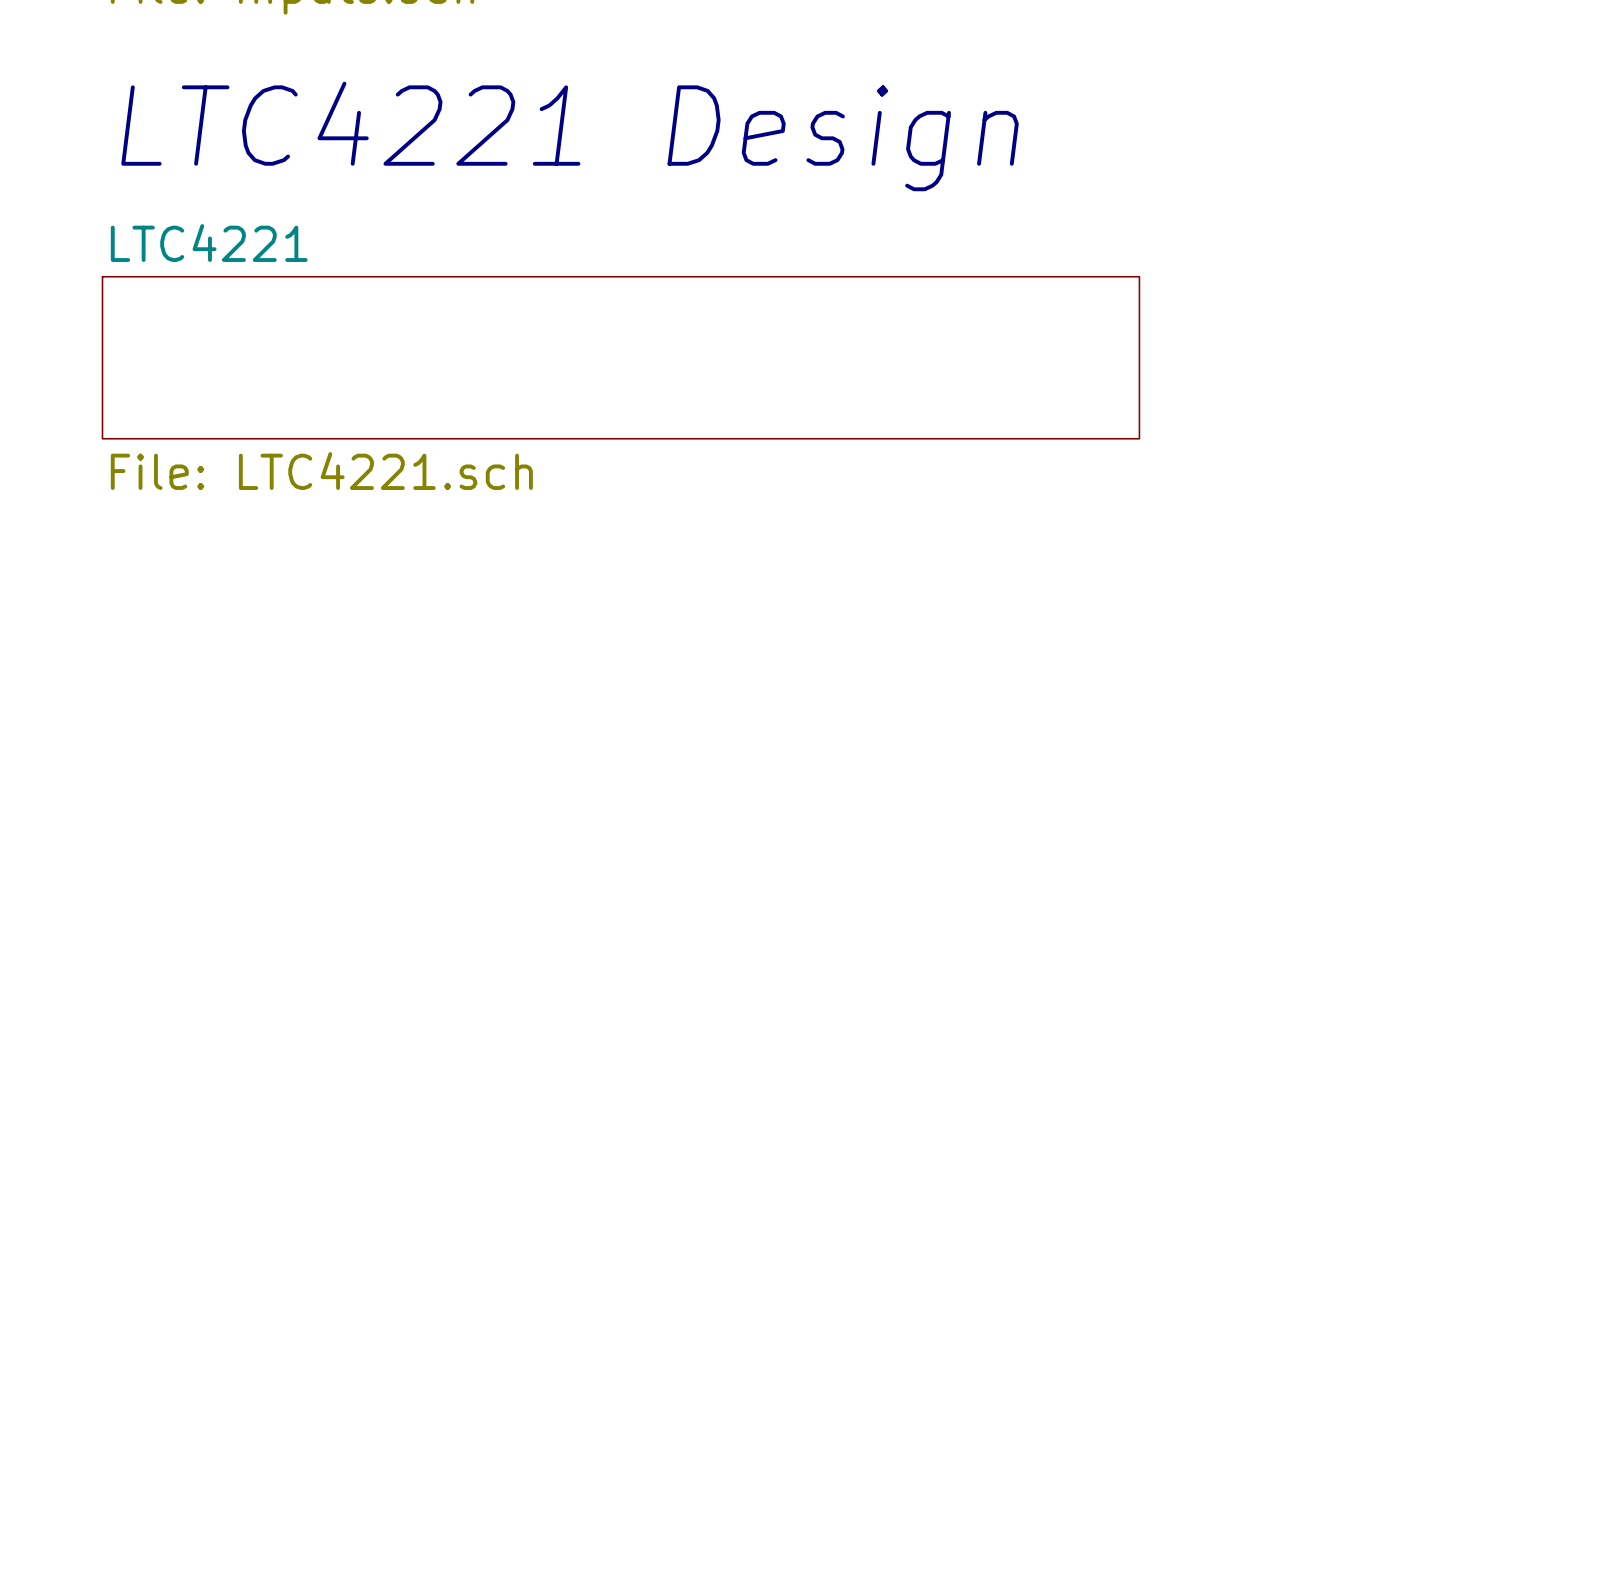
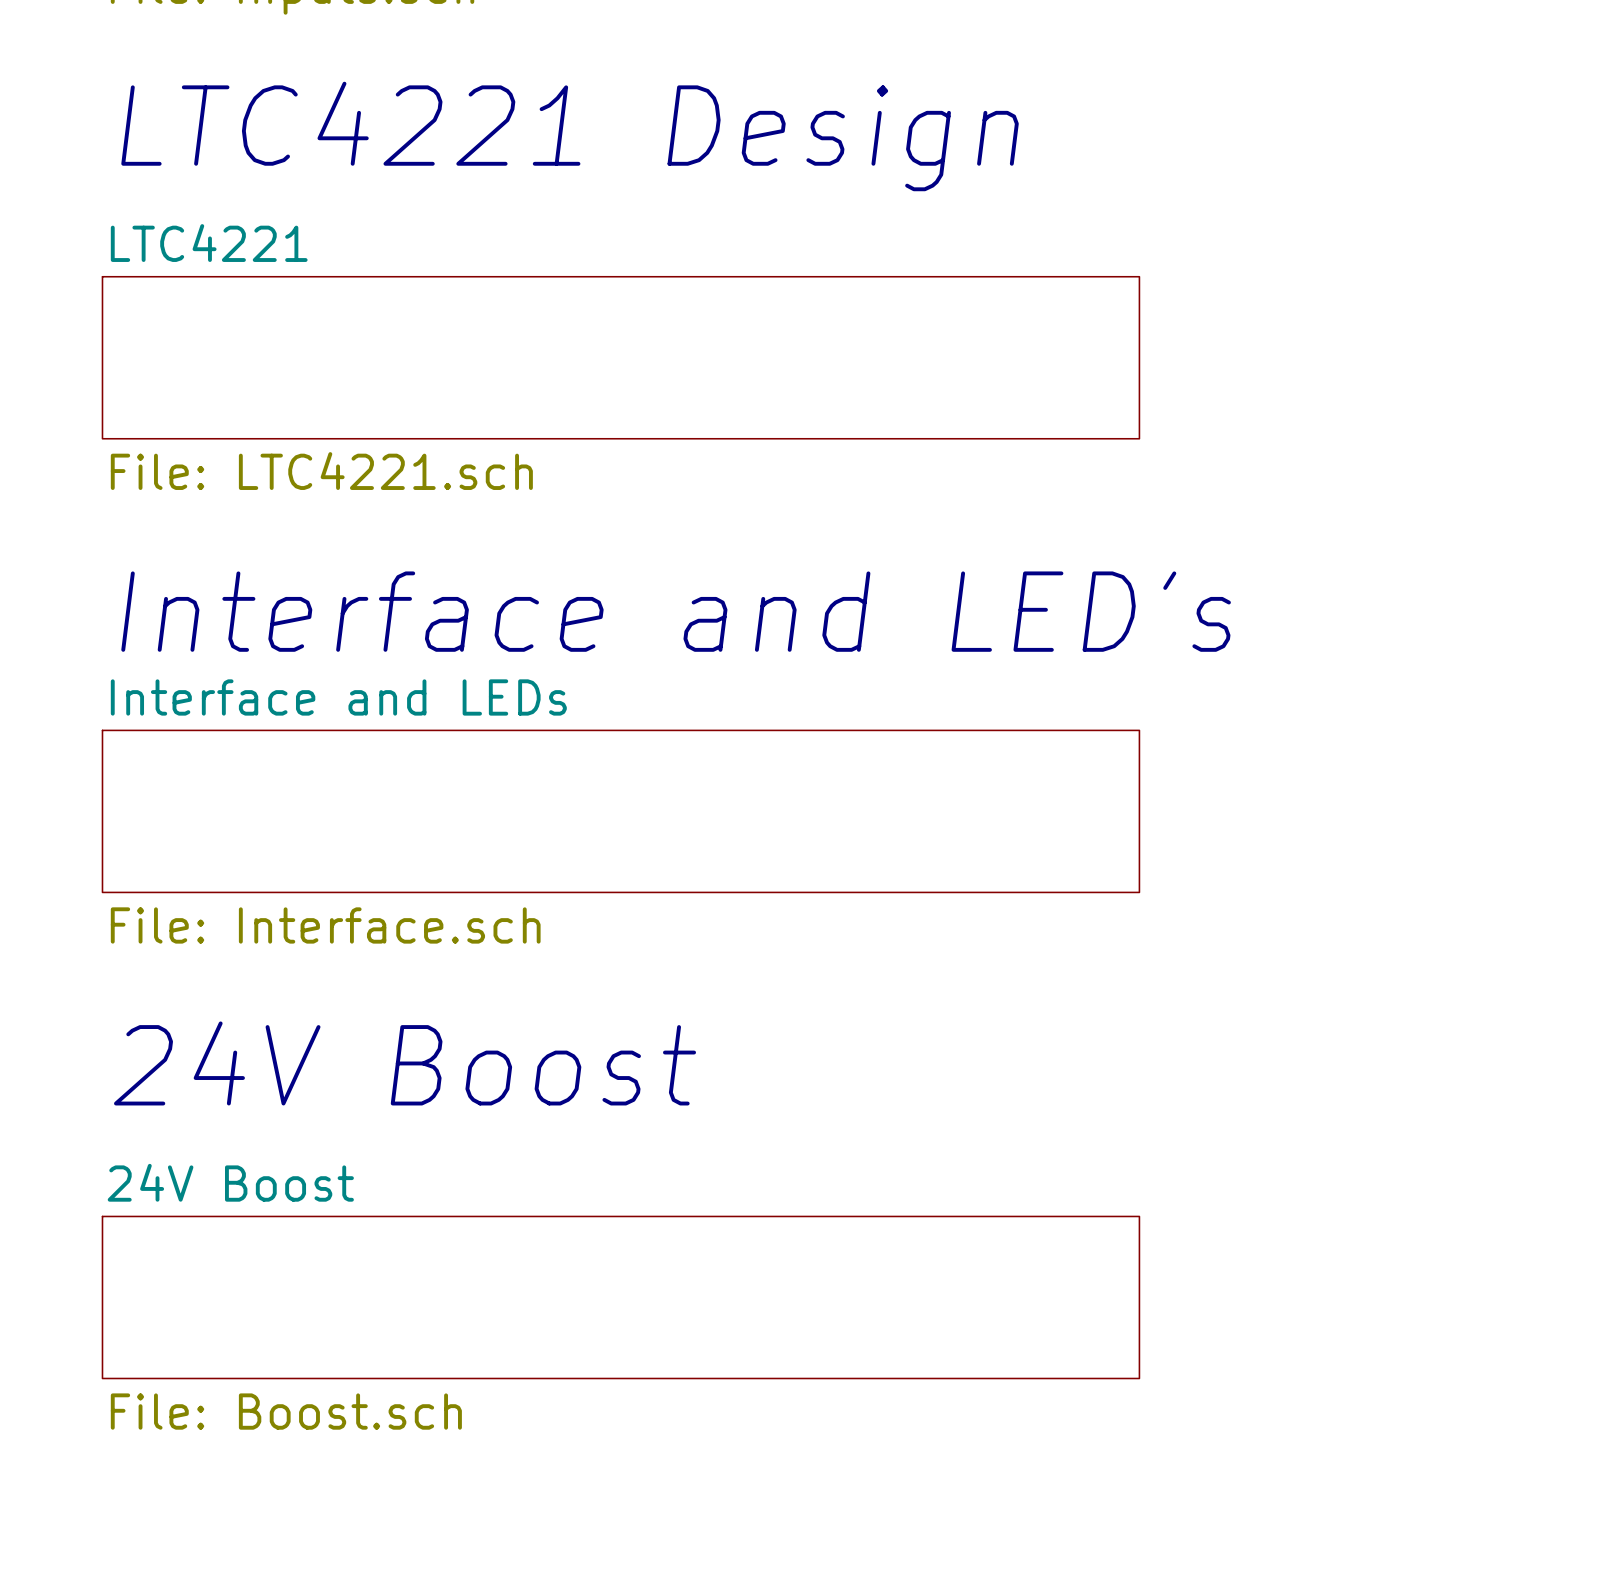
text: none -> Interface and LED's (676, 611)
sheet Interface and LEDs: none -> File: Interface.sch (620, 811)
text: none -> 24V Boost (405, 1063)
sheet 24V Boost: none -> File: Boost.sch (620, 1297)

